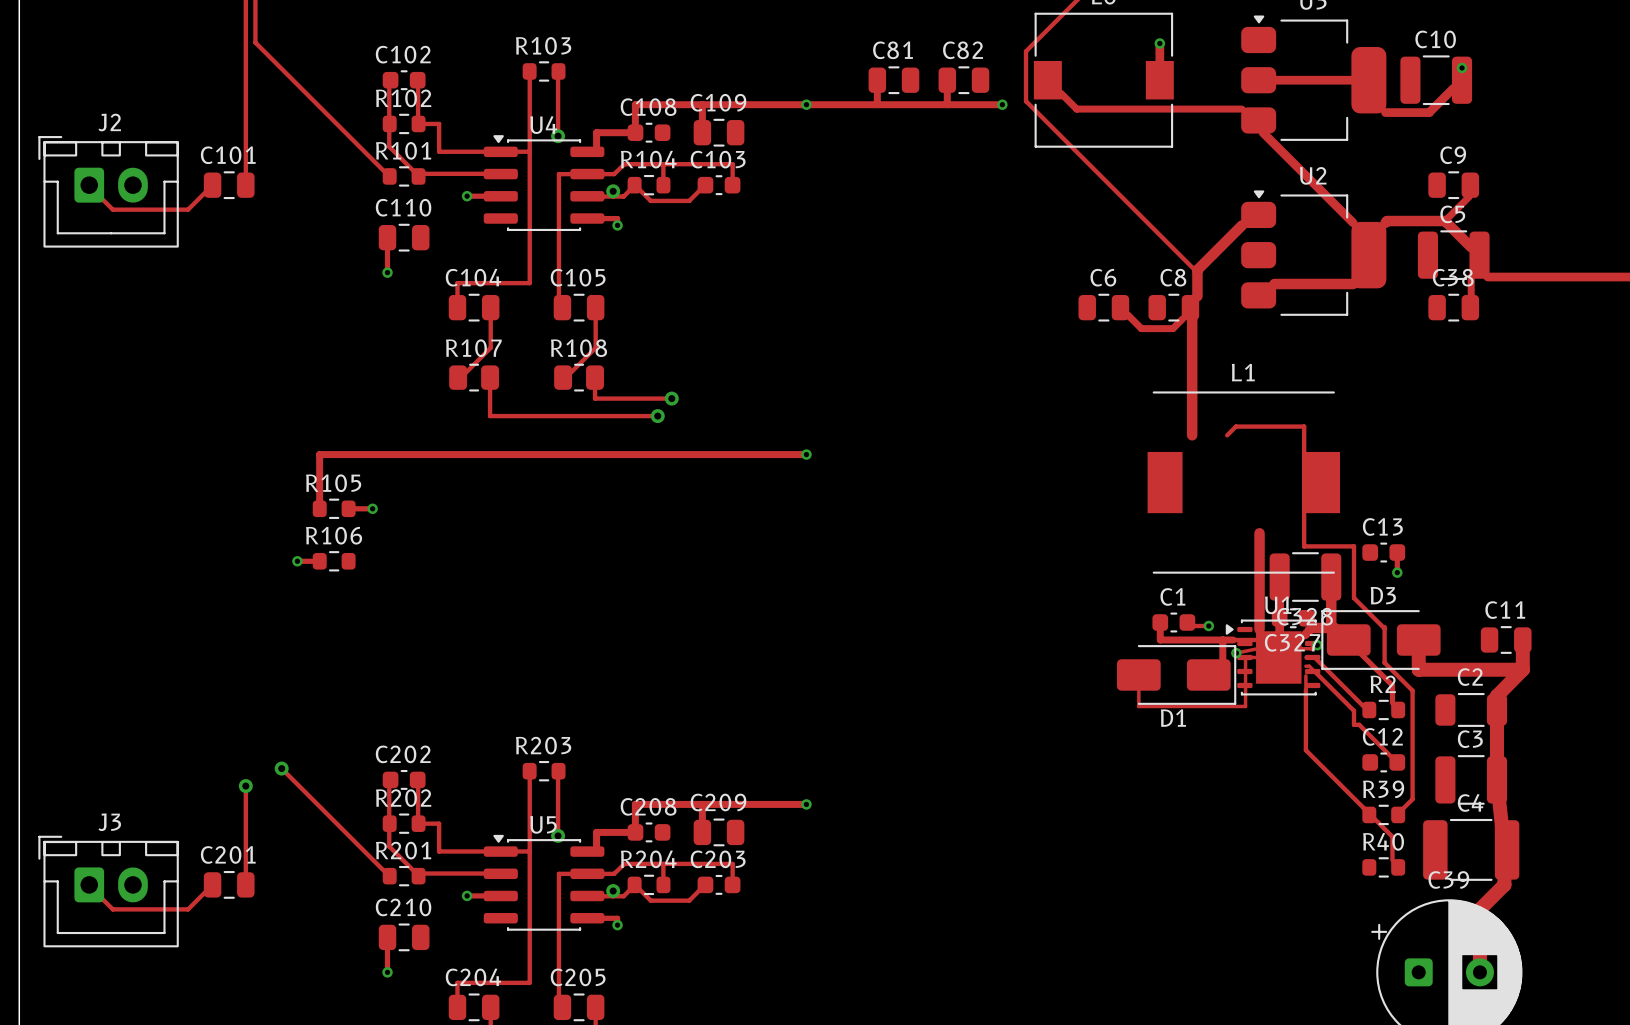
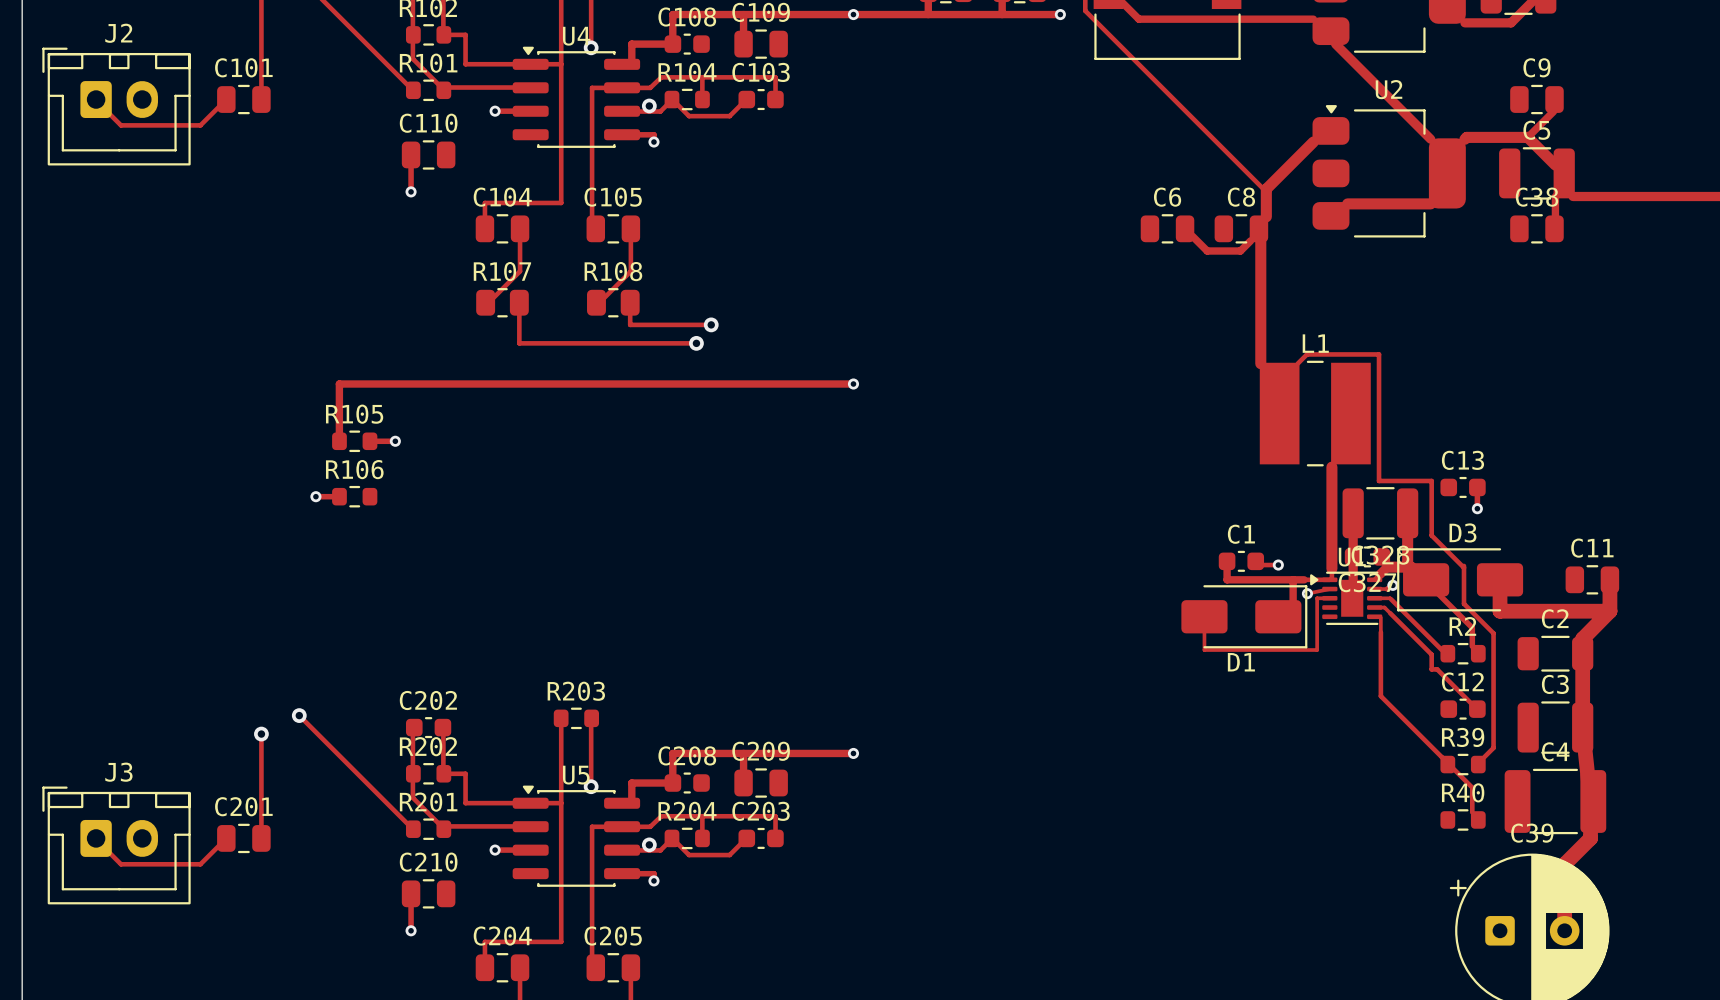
L1 name position: L1 (1243, 372) -> L1 (1315, 343)
L1 footprint: [1147, 391, 1341, 574] -> [1259, 360, 1371, 467]
U1 footprint: [1225, 619, 1321, 696] -> [1310, 571, 1383, 625]

